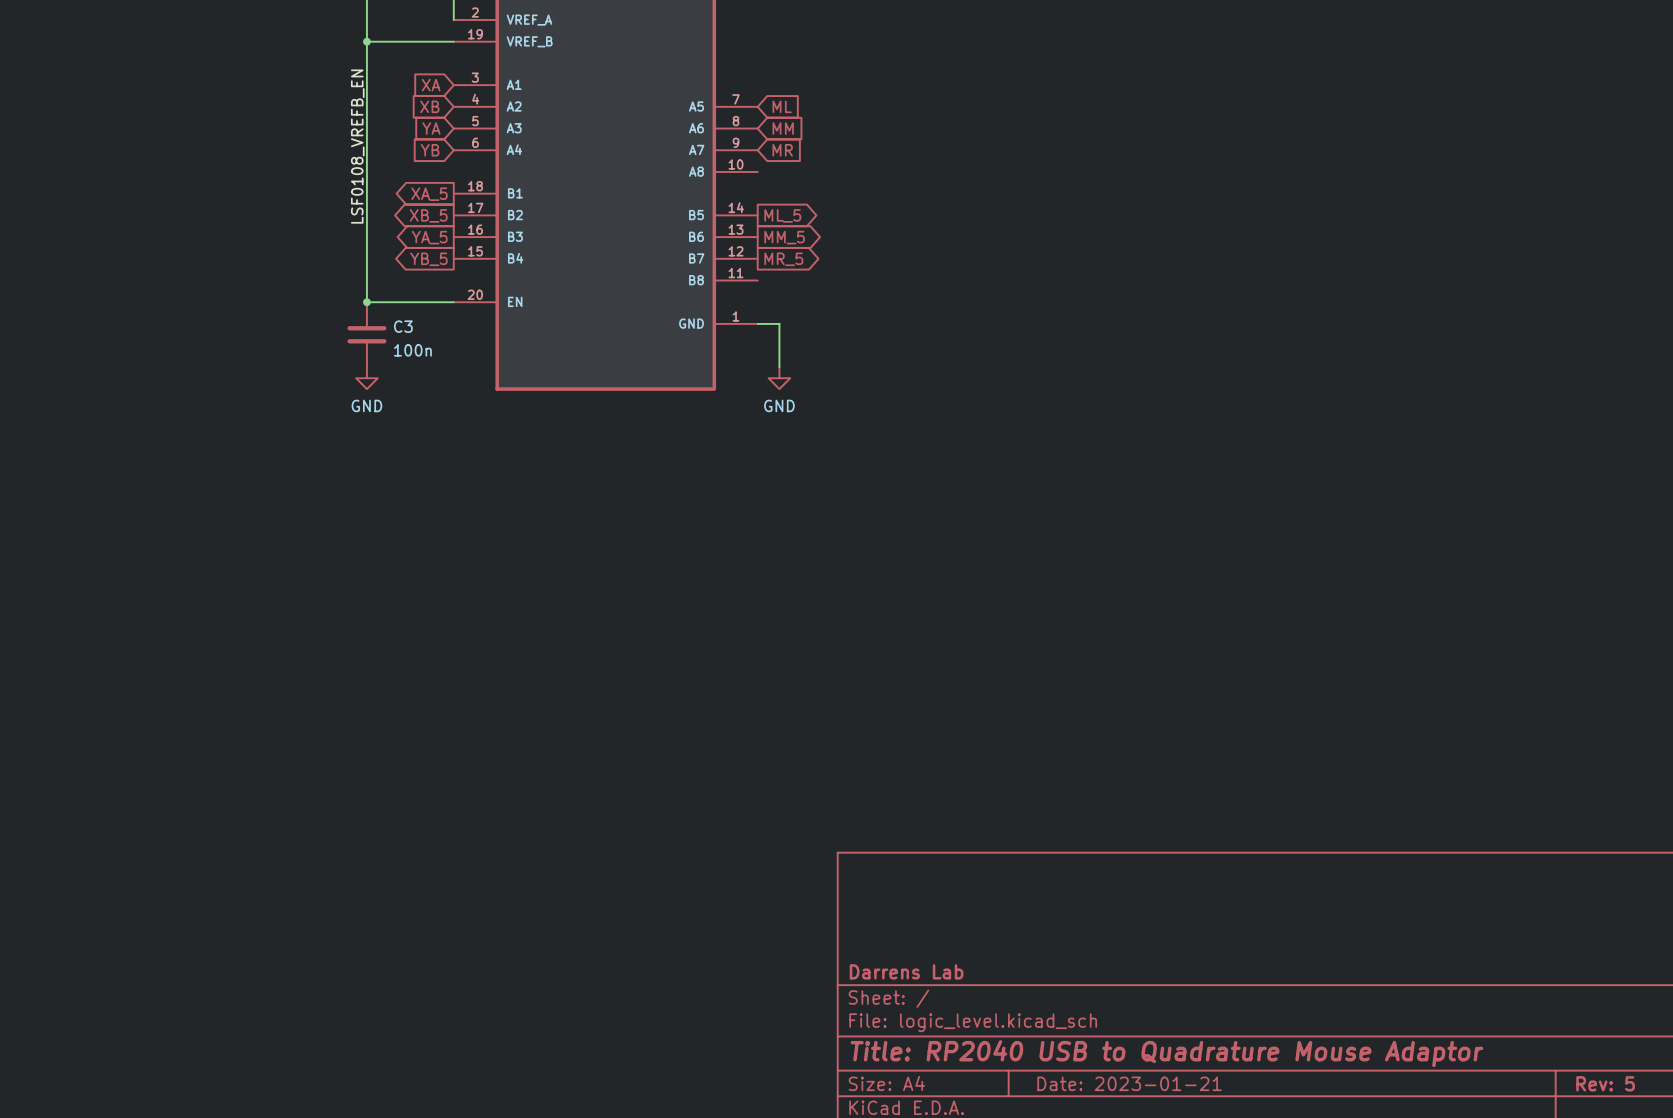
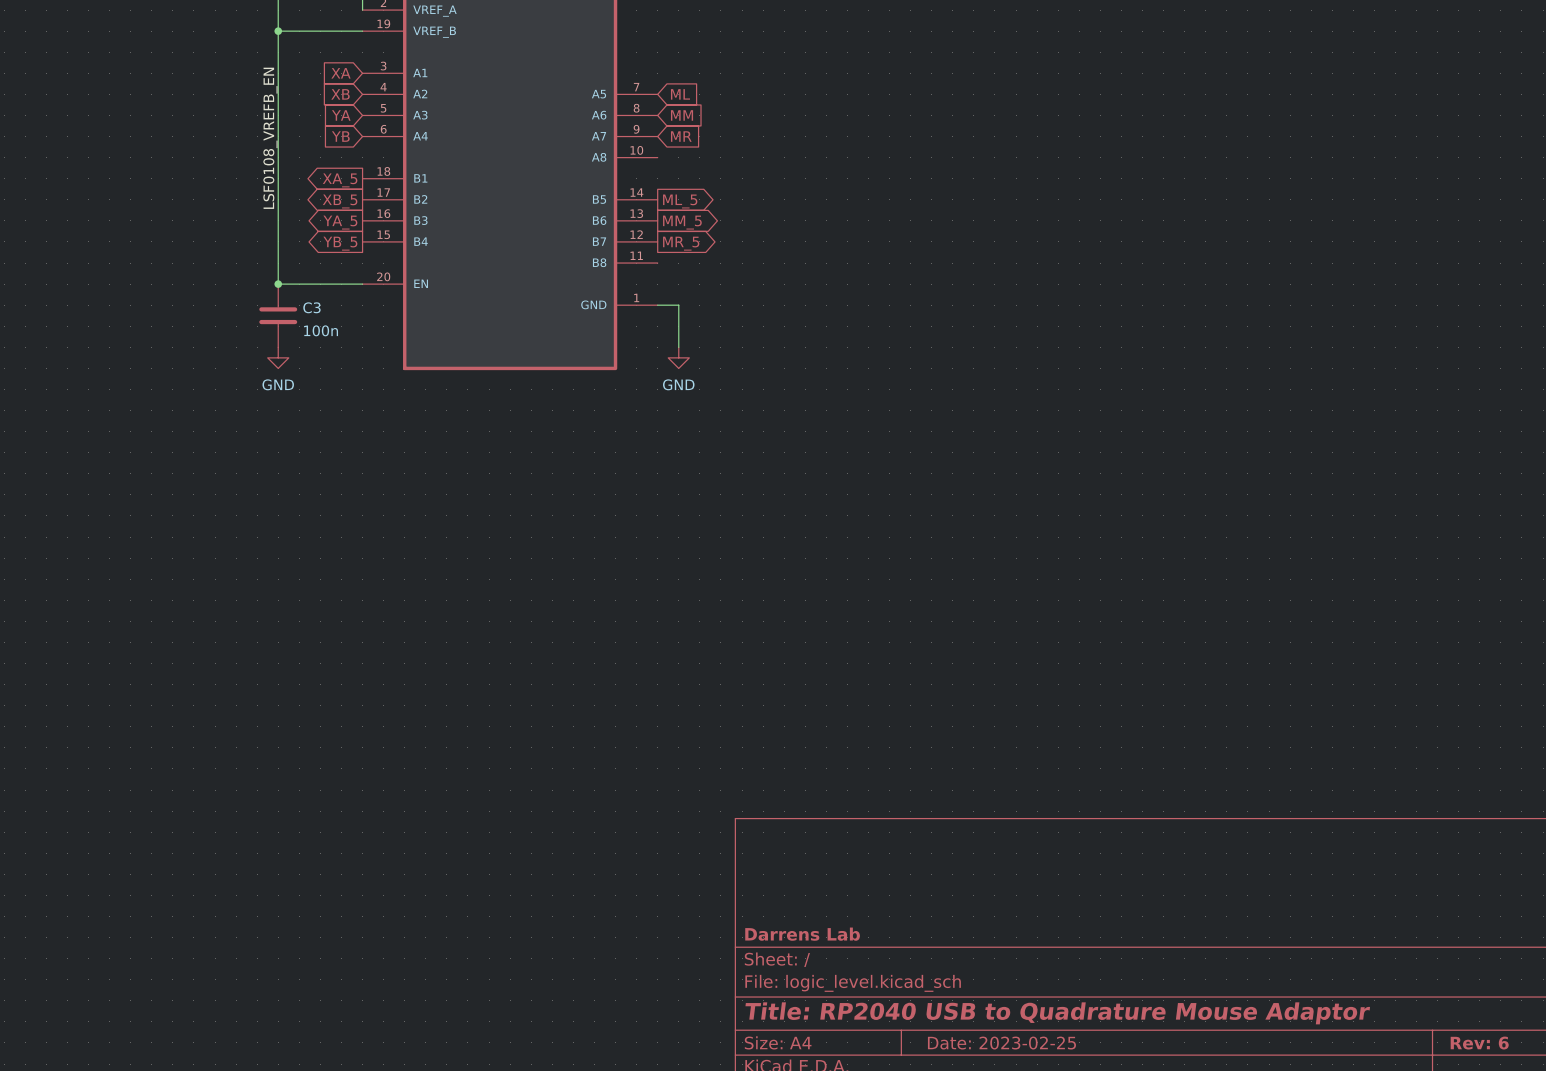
title block: Date: 2023-01-21 (1129, 1083) -> Date: 2023-02-25 (1001, 1043)
title block: Rev: 5 (1605, 1083) -> Rev: 6 (1479, 1043)

